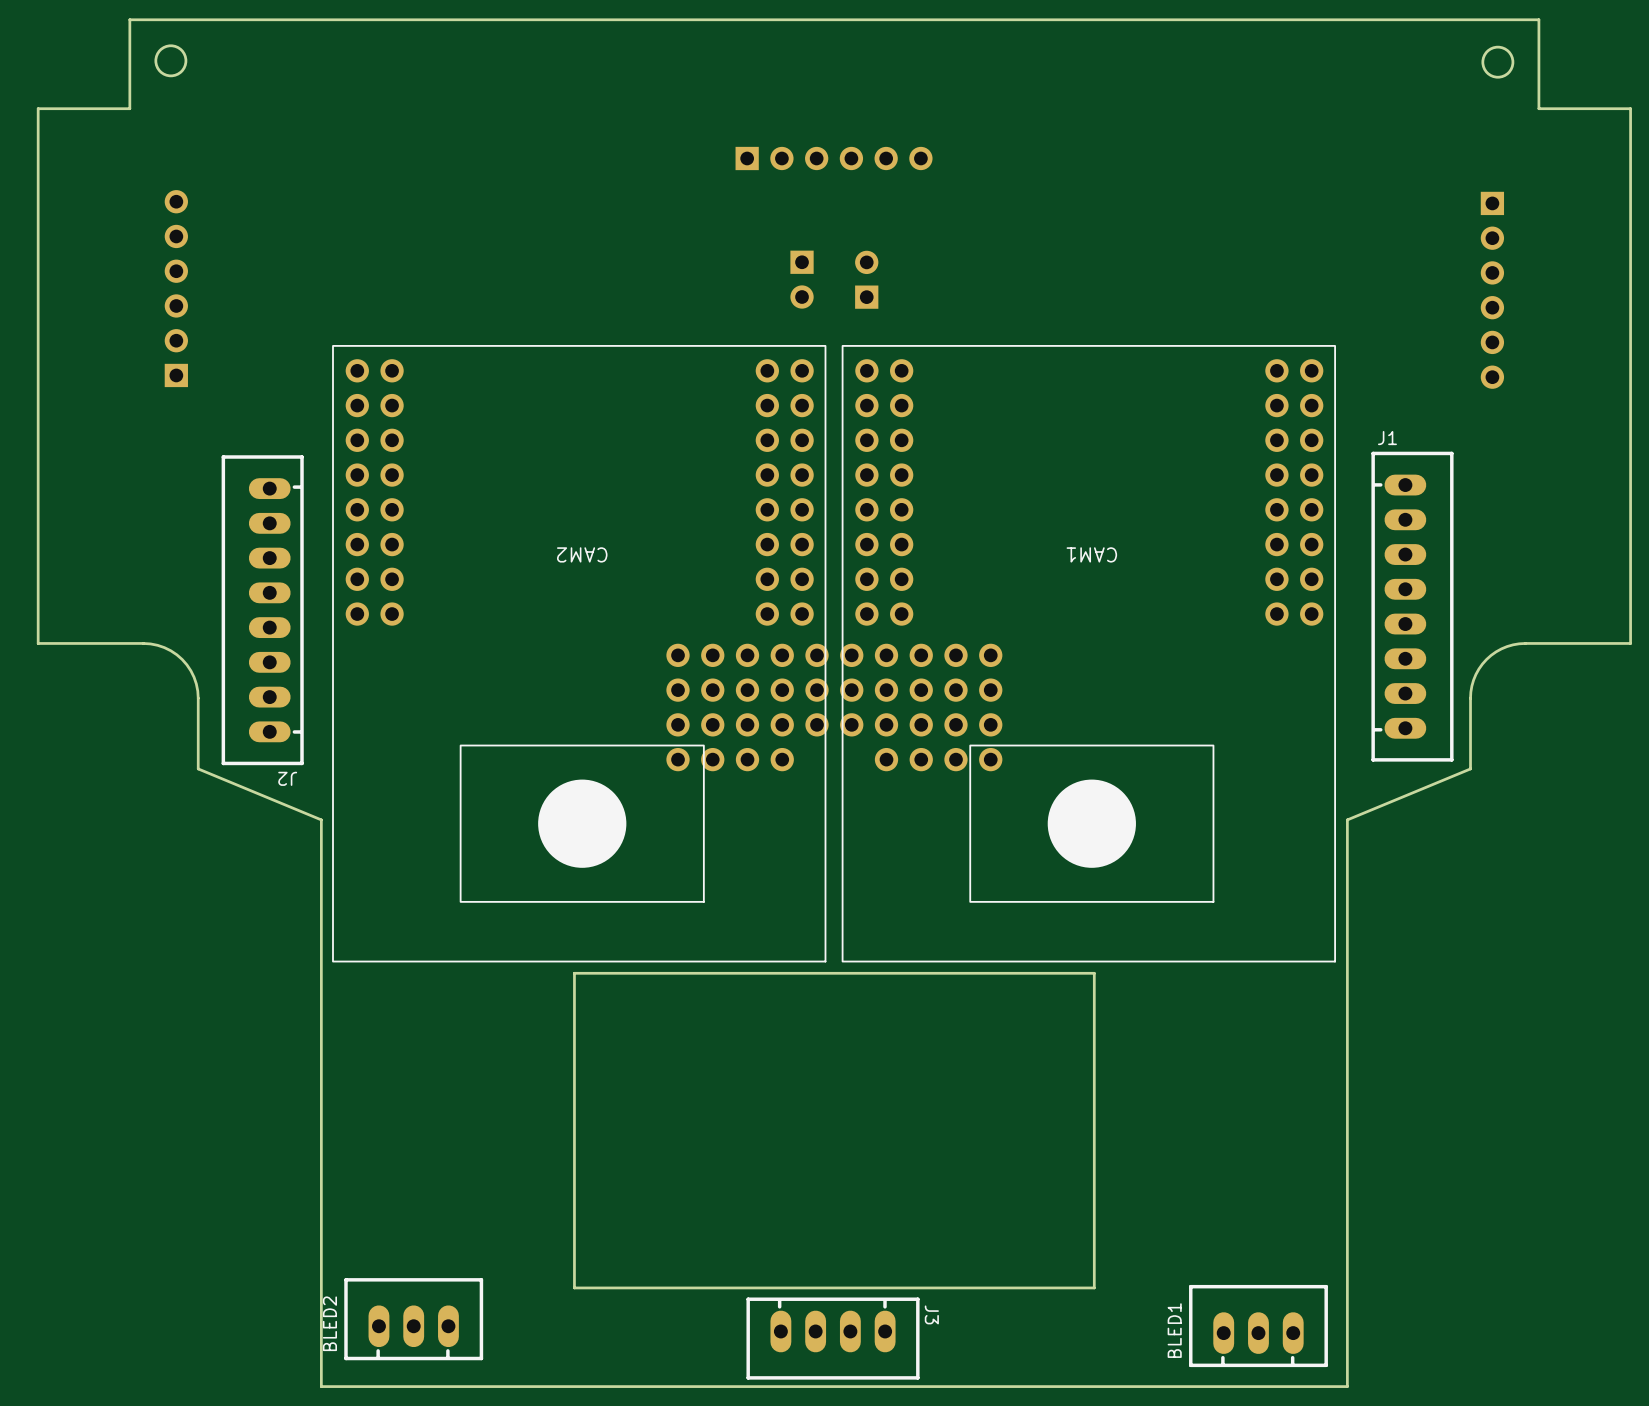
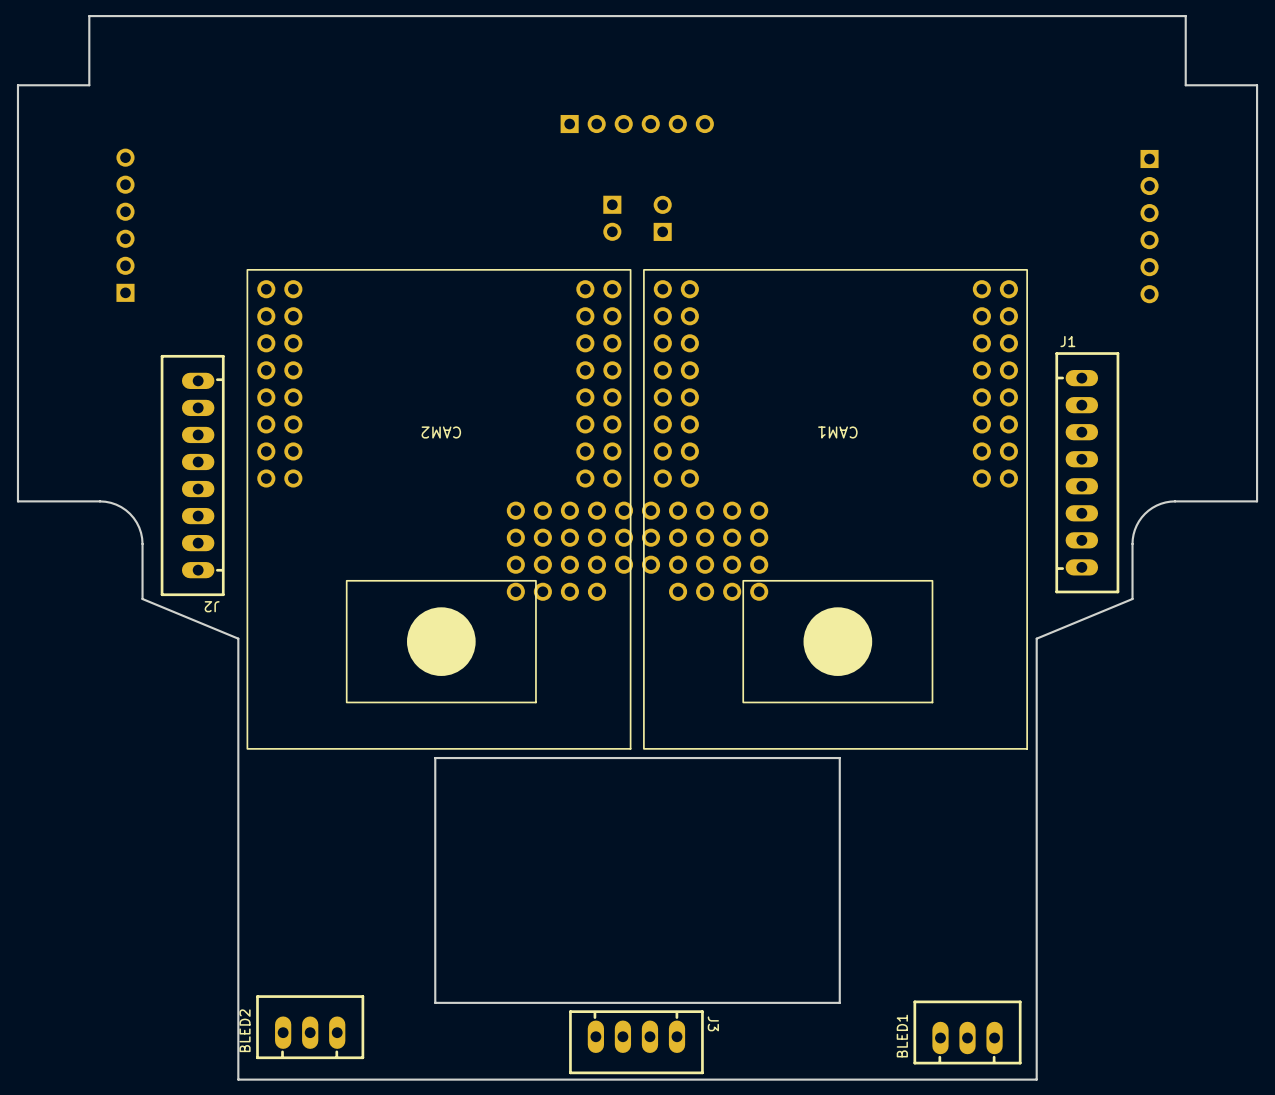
round board edge: [154, 44, 188, 78] -> none
round board edge: [1481, 45, 1515, 79] -> none

